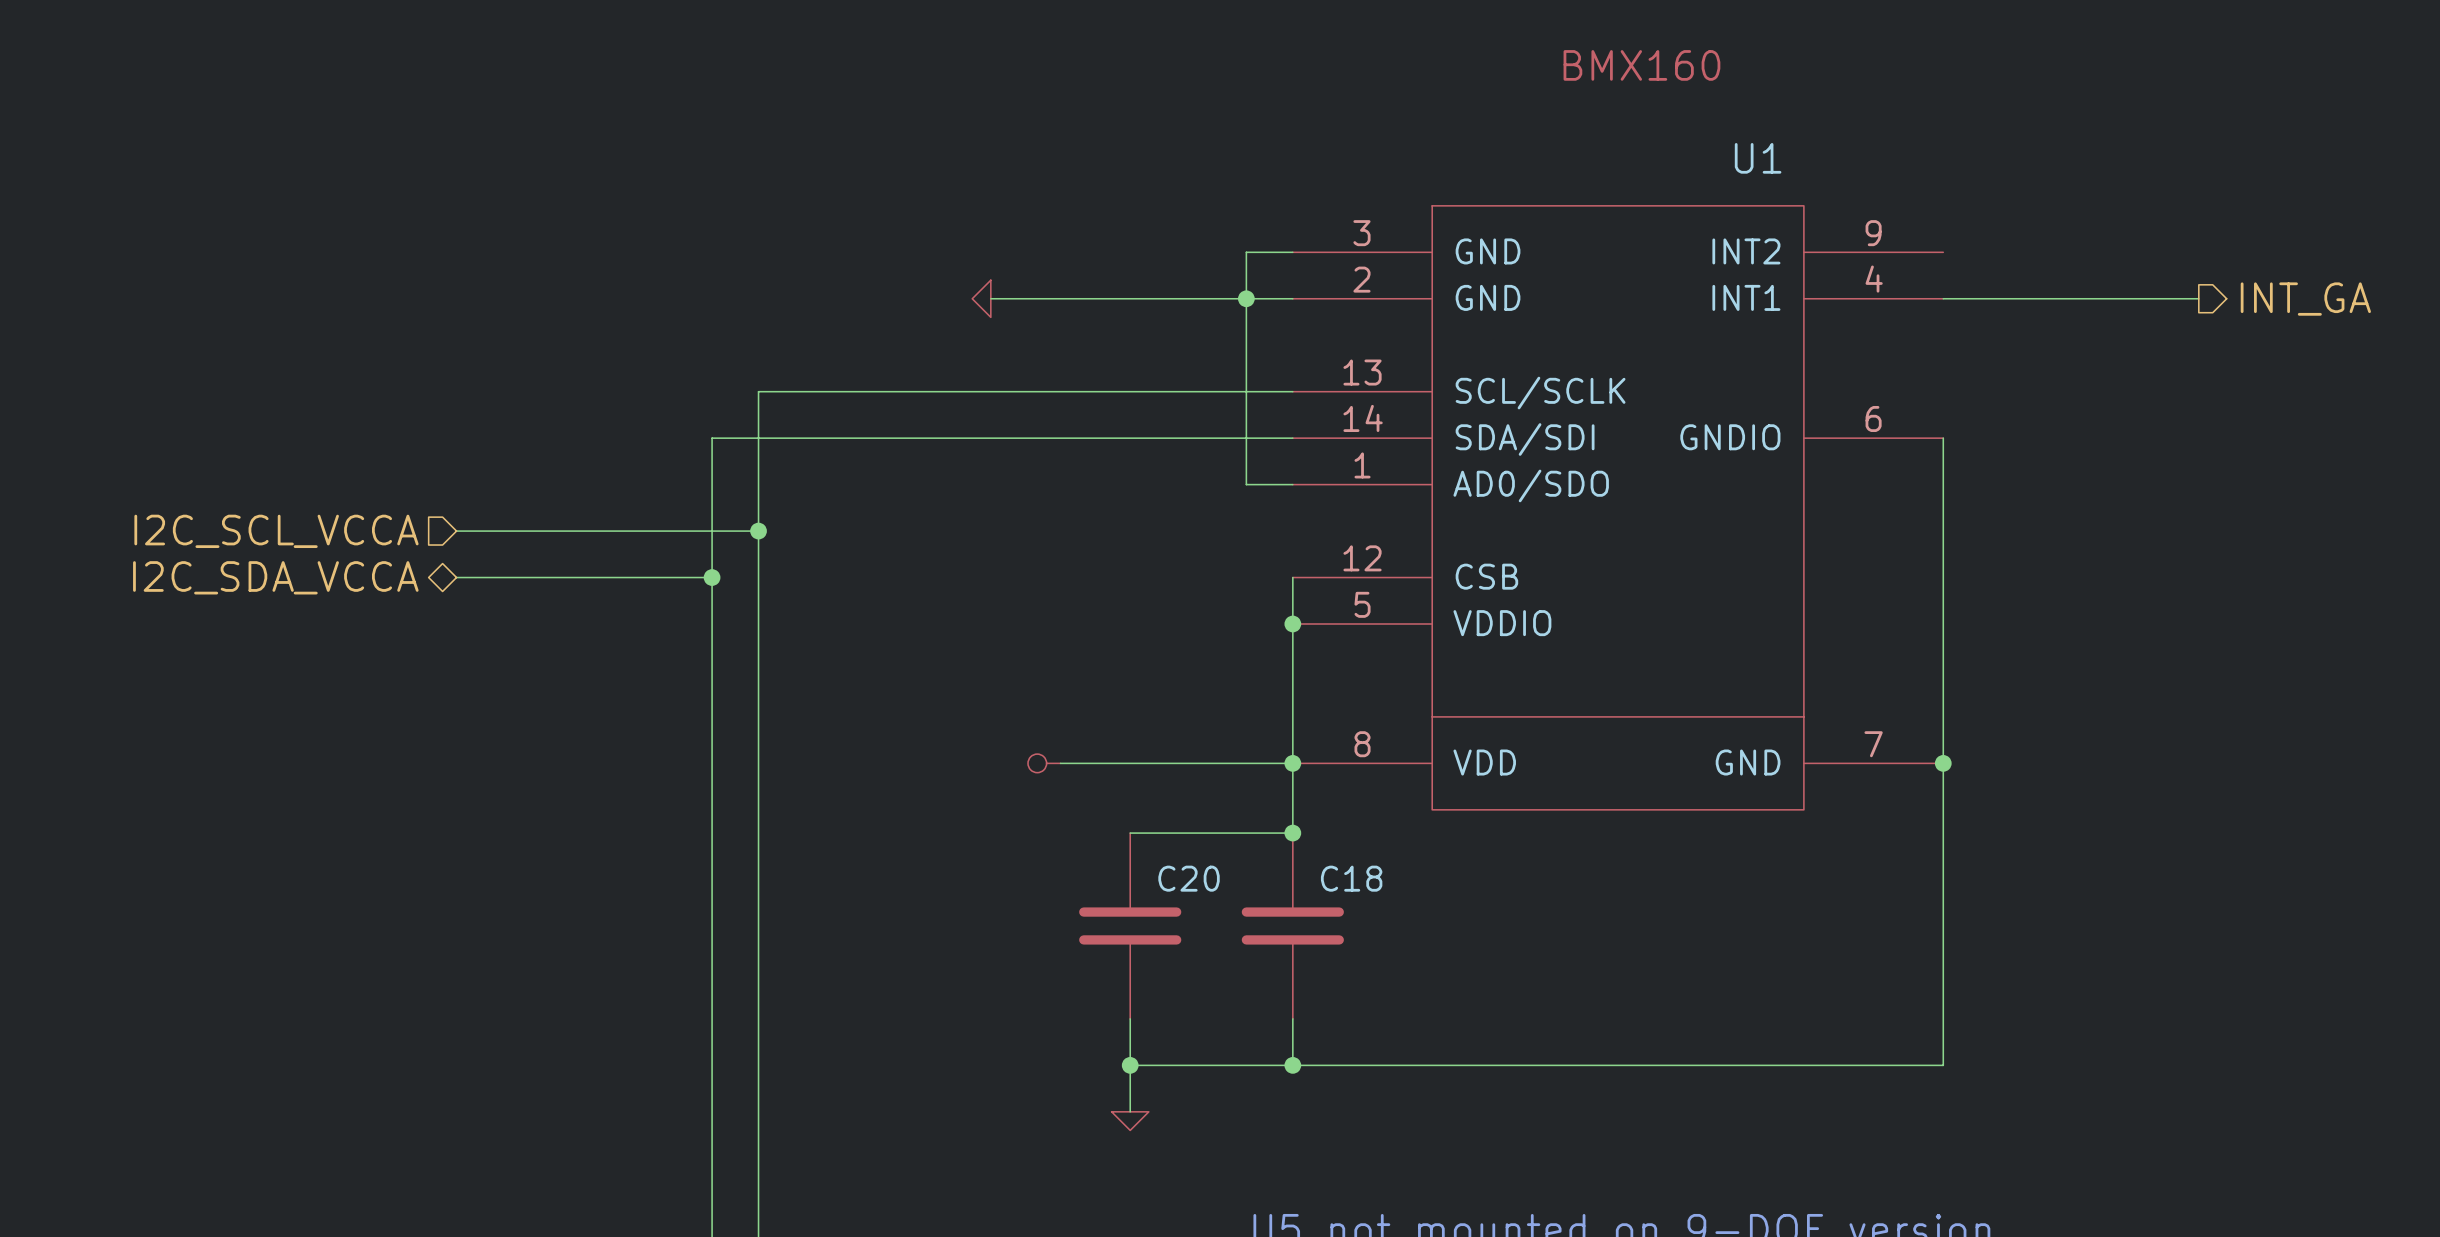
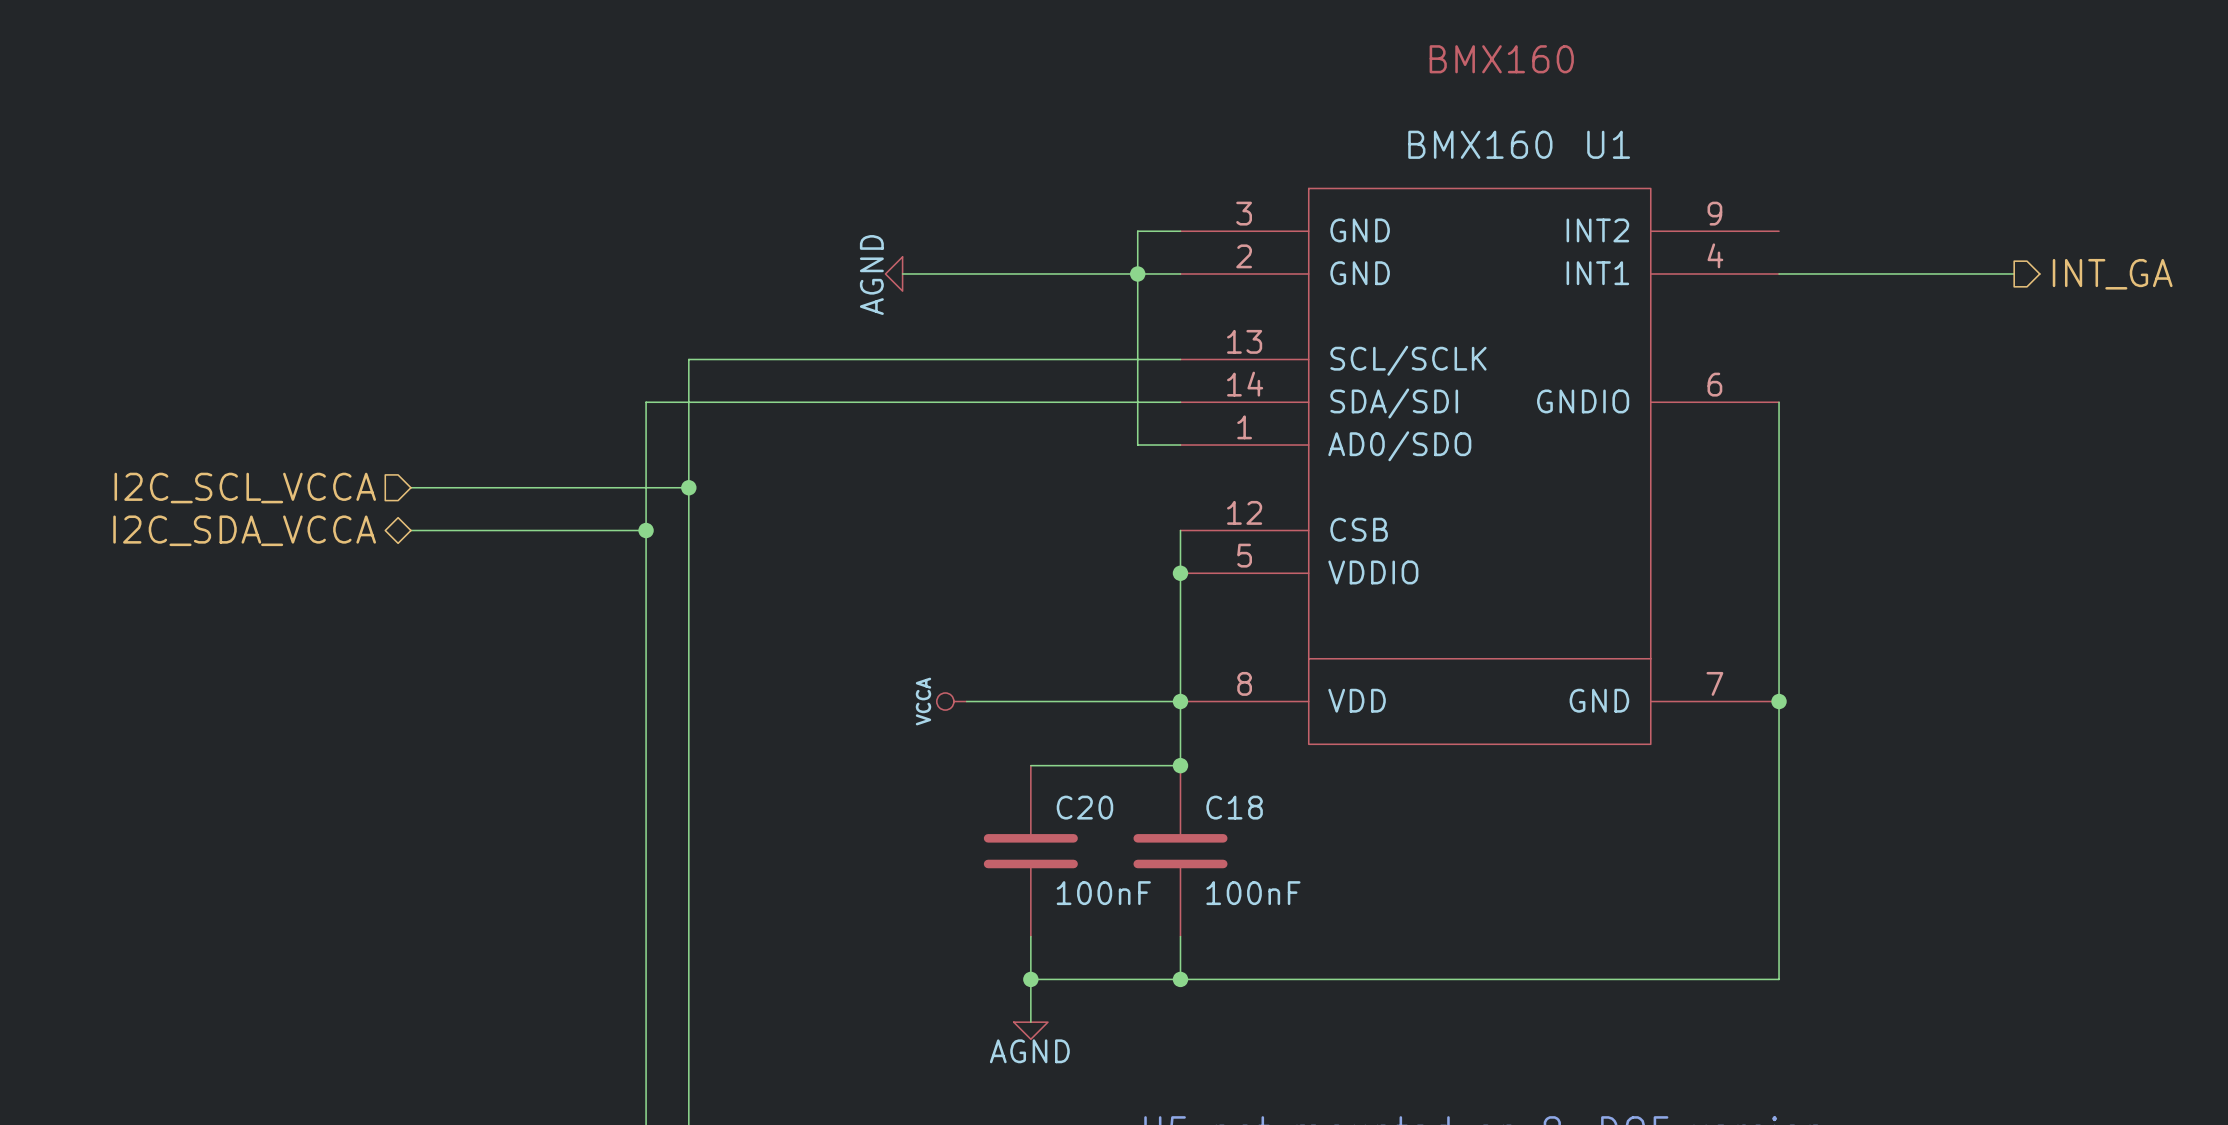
U1 value: none -> BMX160 (1480, 144)
power symbol text: none -> AGND (871, 275)
power symbol text: none -> VCCA (923, 701)
C20 value: none -> 100nF (1103, 893)
C18 value: none -> 100nF (1253, 893)
power symbol text: none -> AGND (1029, 1051)

